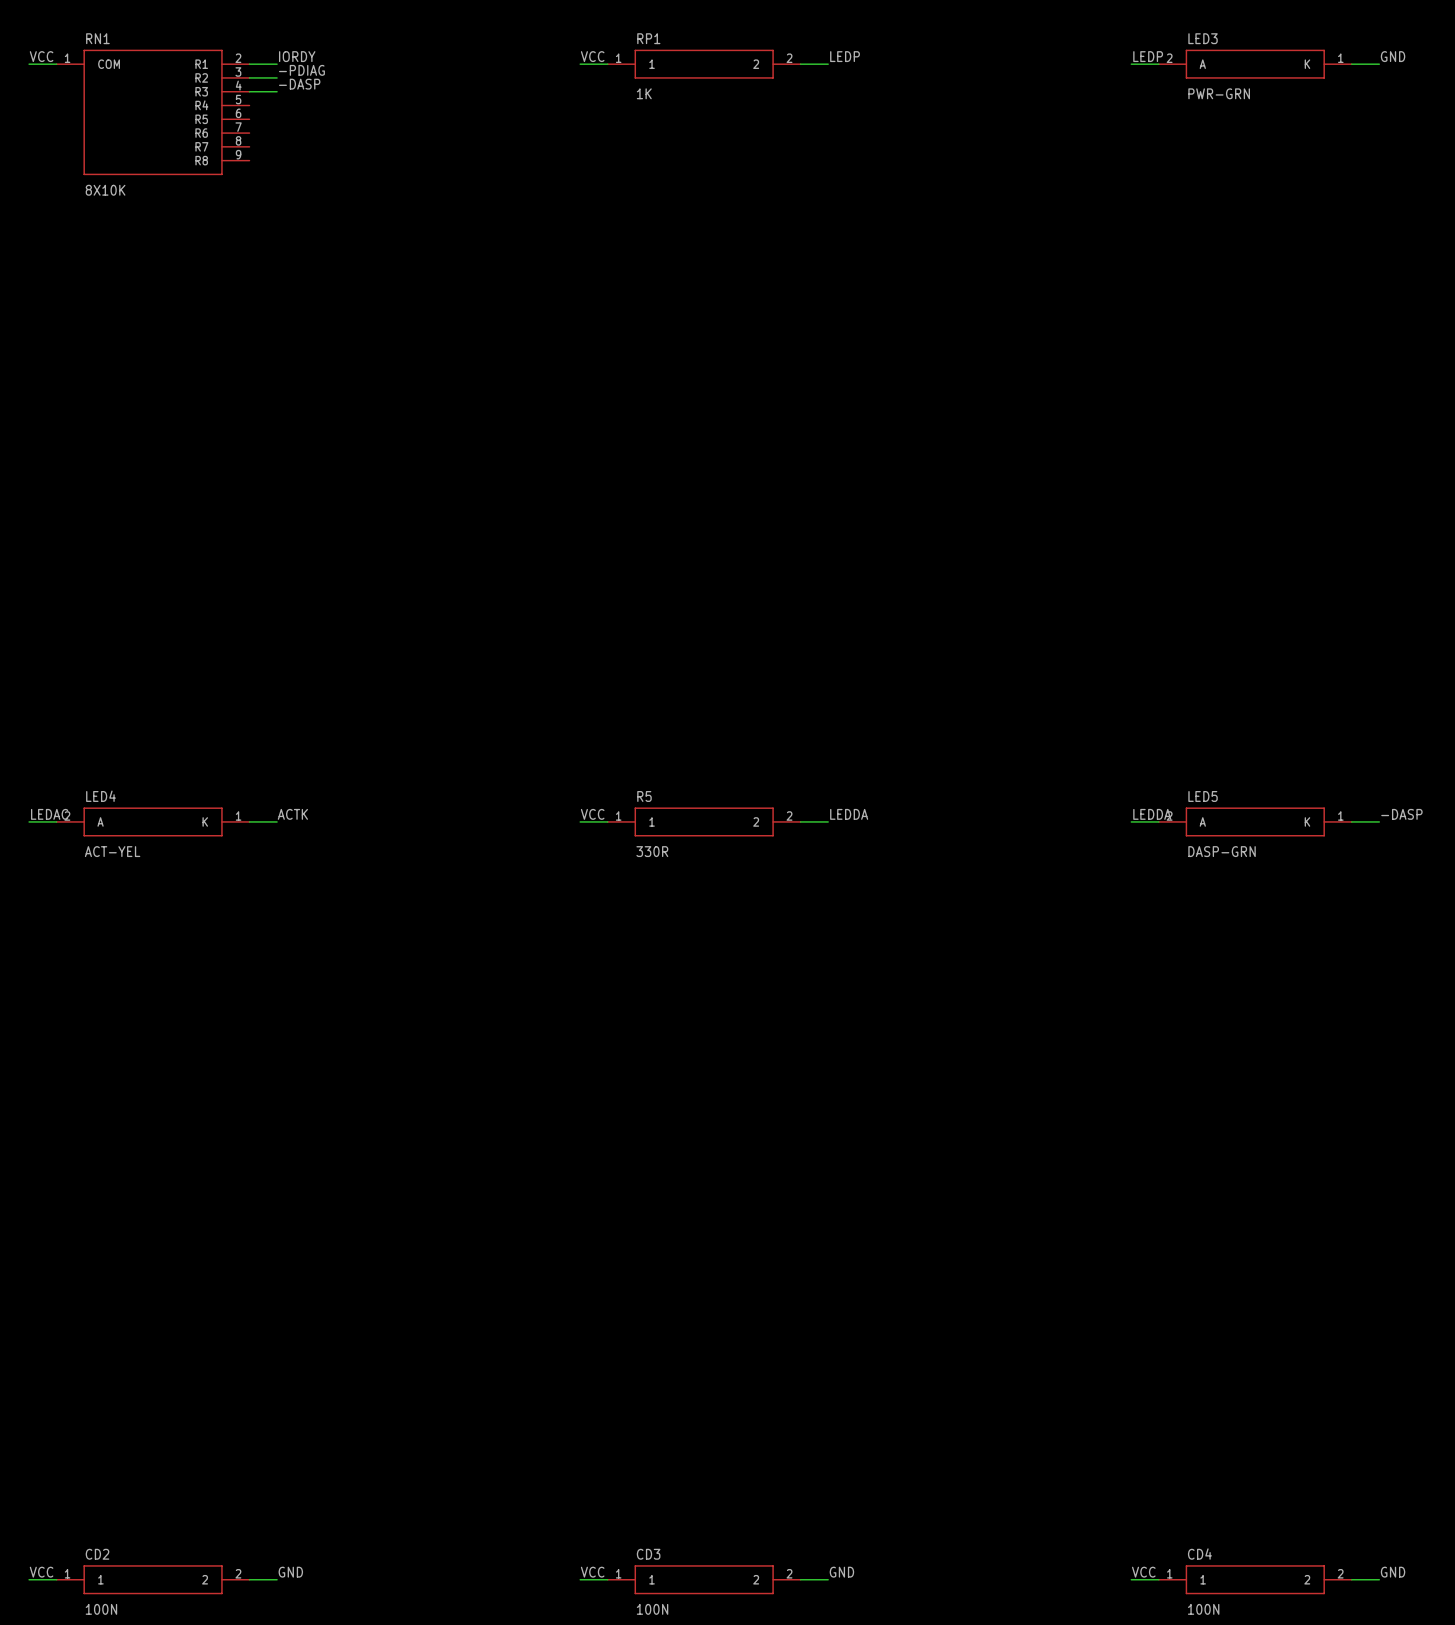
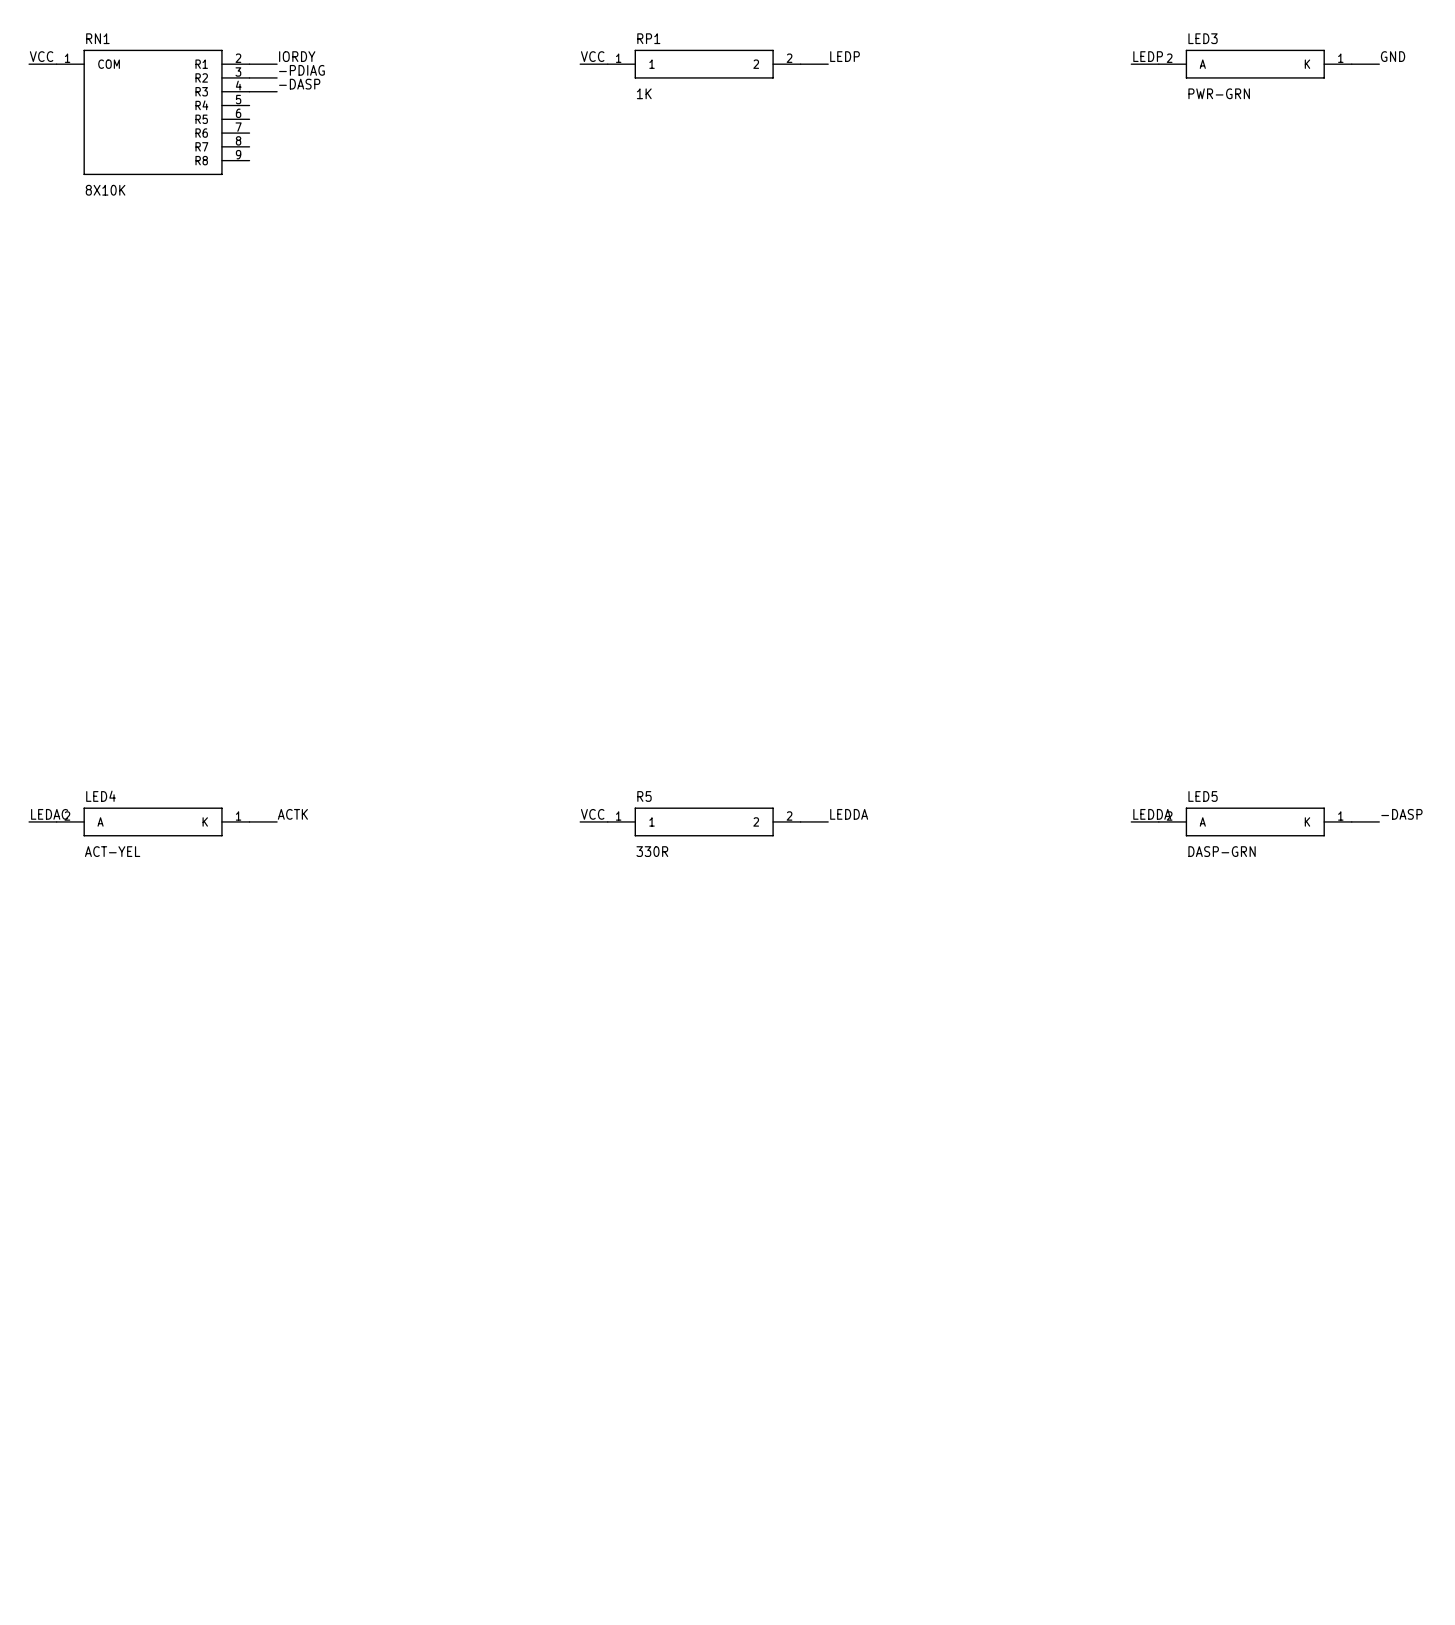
label: VCC (41, 1572) -> none
label: GND (290, 1572) -> none
label: VCC (592, 1572) -> none
label: GND (841, 1572) -> none
label: VCC (1143, 1572) -> none
label: GND (1393, 1572) -> none
wire: (29, 1579) (56, 1579) -> none
CD2: 100N (153, 1579) -> none
wire: (249, 1579) (277, 1579) -> none
wire: (580, 1579) (607, 1579) -> none
CD3: 100N (704, 1579) -> none
wire: (800, 1579) (828, 1579) -> none
wire: (1131, 1579) (1158, 1579) -> none
CD4: 100N (1255, 1579) -> none
wire: (1351, 1579) (1379, 1579) -> none

